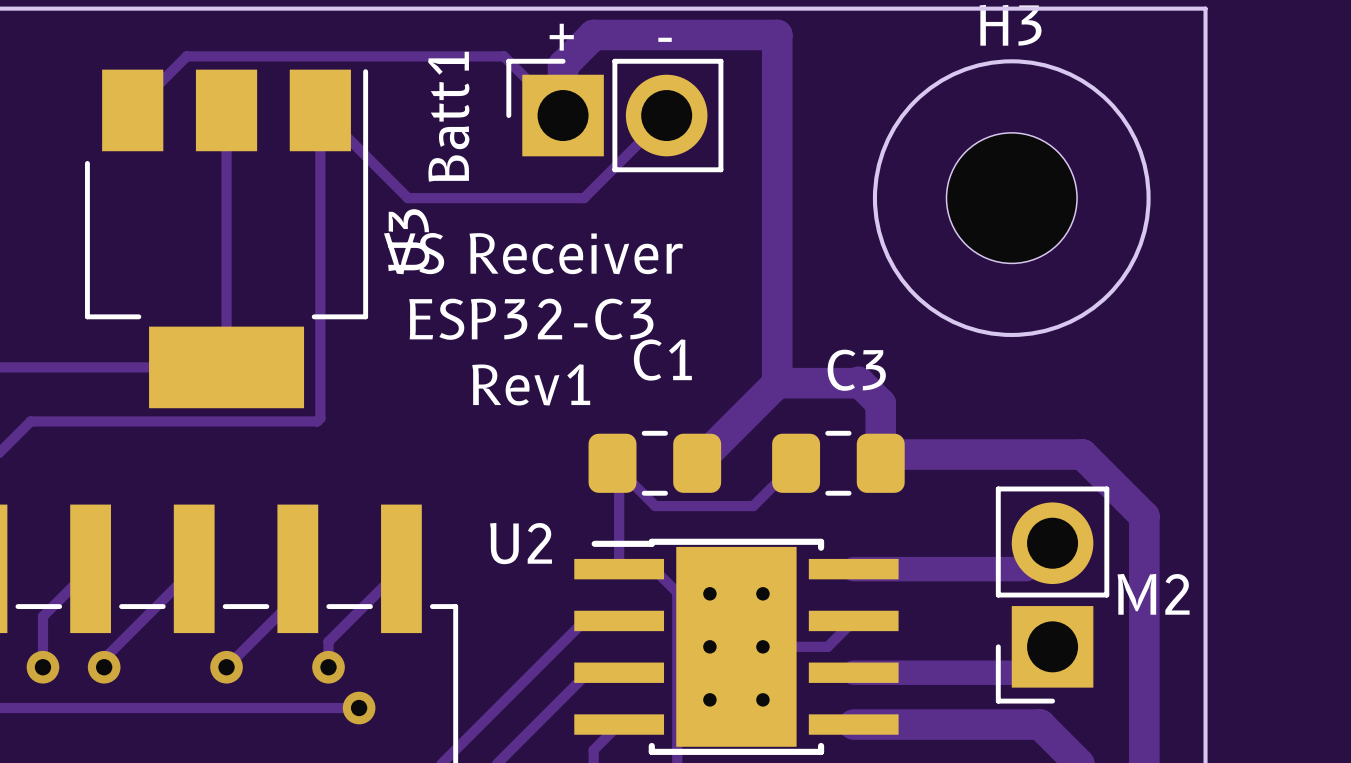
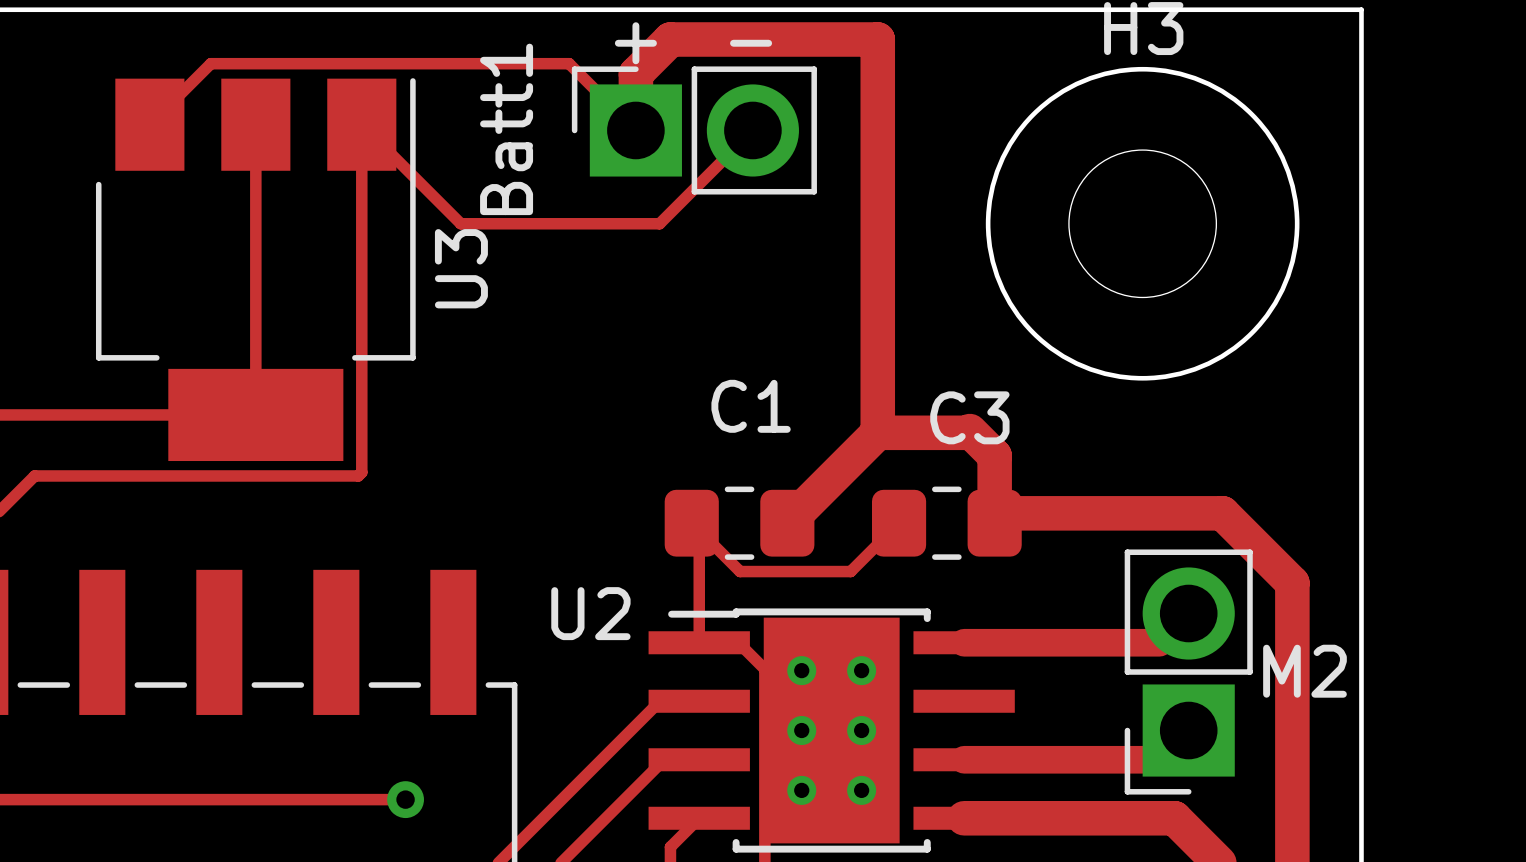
text: VS Receiver (533, 253) -> none
text: ESP32-C3 (531, 319) -> none
text: Rev1 (531, 384) -> none
track: (90, 568) (42, 616) (42, 667) -> none
track: (194, 568) (104, 658) (104, 667) -> none
track: (297, 568) (297, 595) (226, 667) -> none
track: (401, 568) (328, 641) (328, 667) -> none
track: (853, 620) (827, 646) (762, 646) -> none
via: (42, 667) -> none
via: (104, 667) -> none
via: (226, 667) -> none
via: (328, 667) -> none

